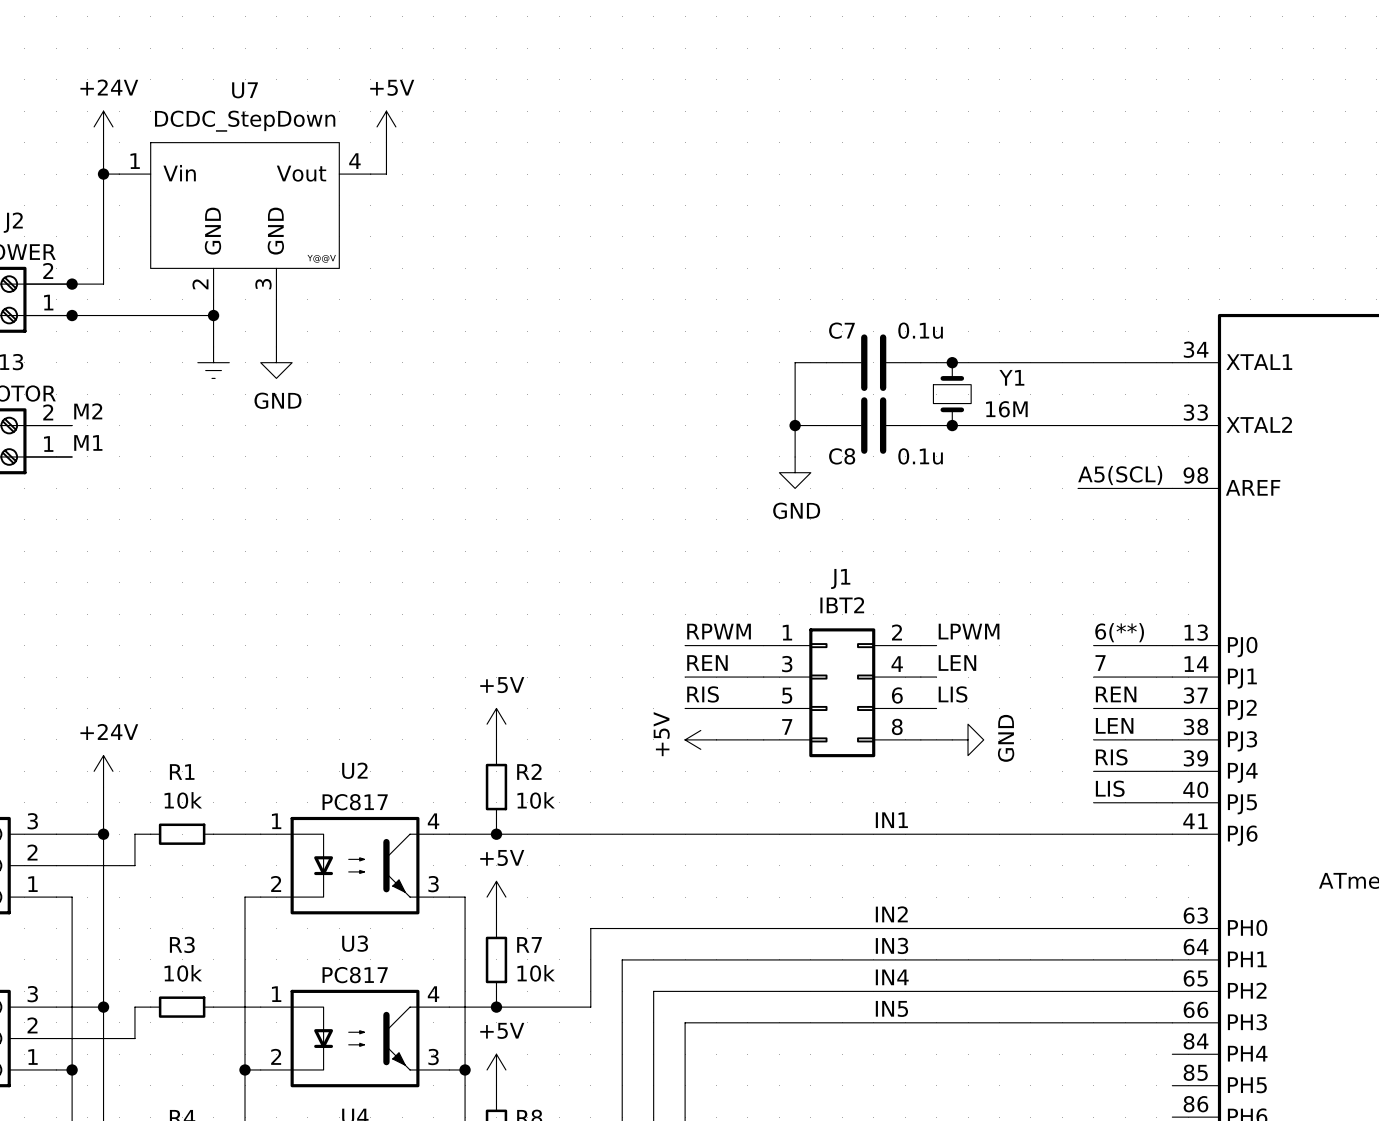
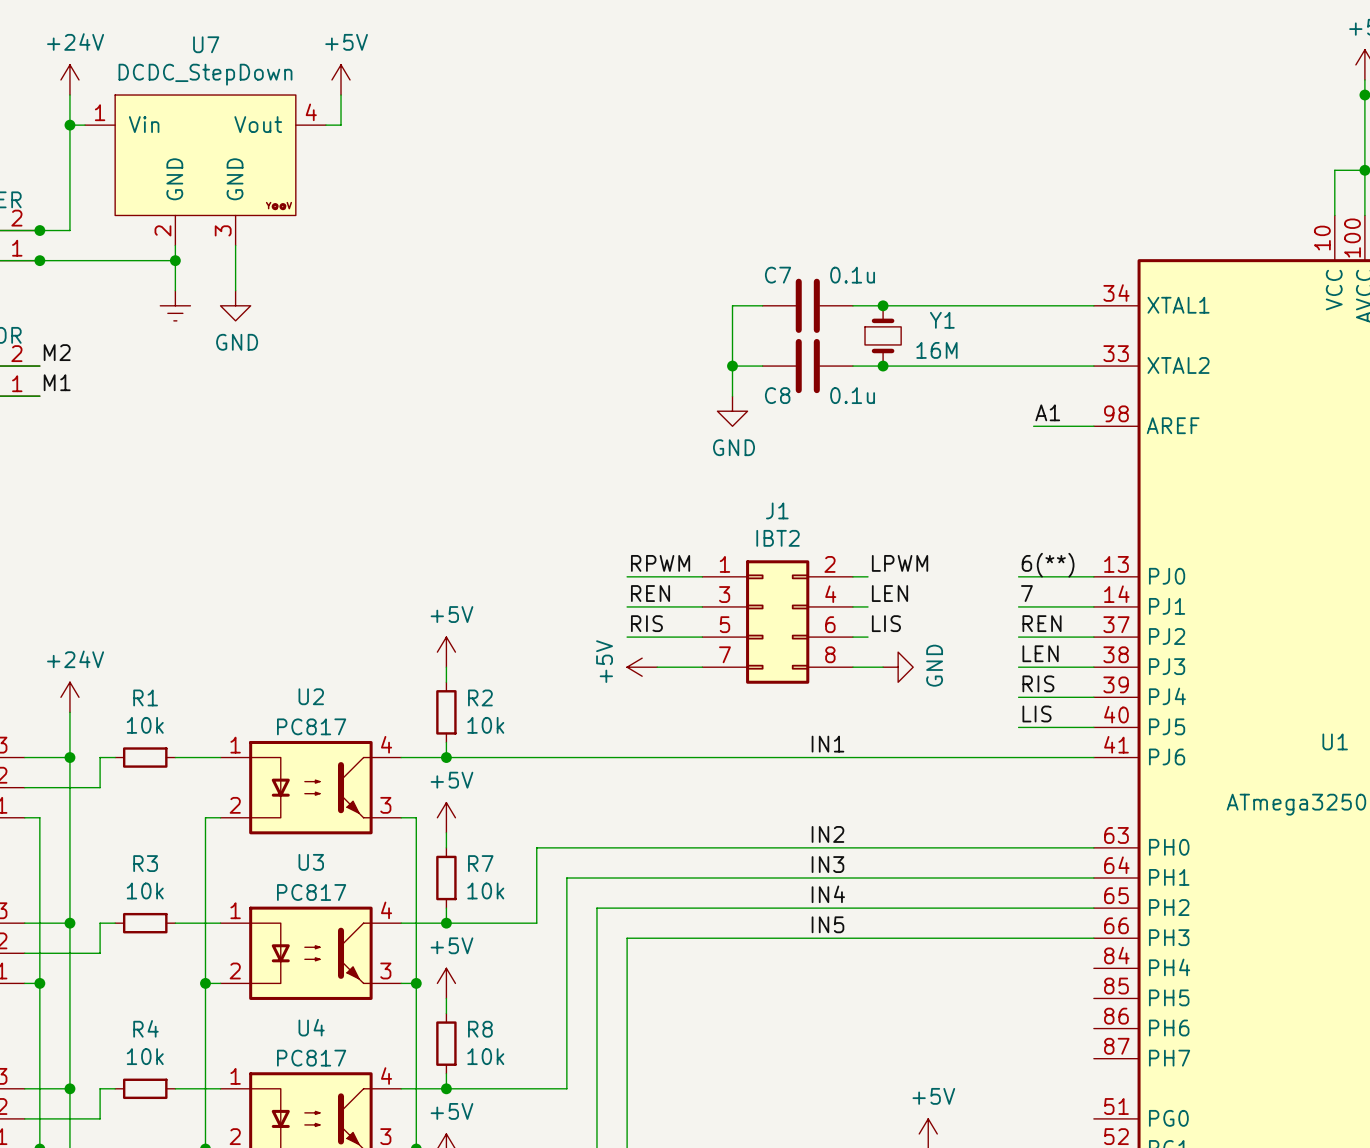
label: none -> A1 (1047, 412)
label: A5(SCL) (1120, 475) -> none
wire: (1078, 488) (1109, 488) -> none

